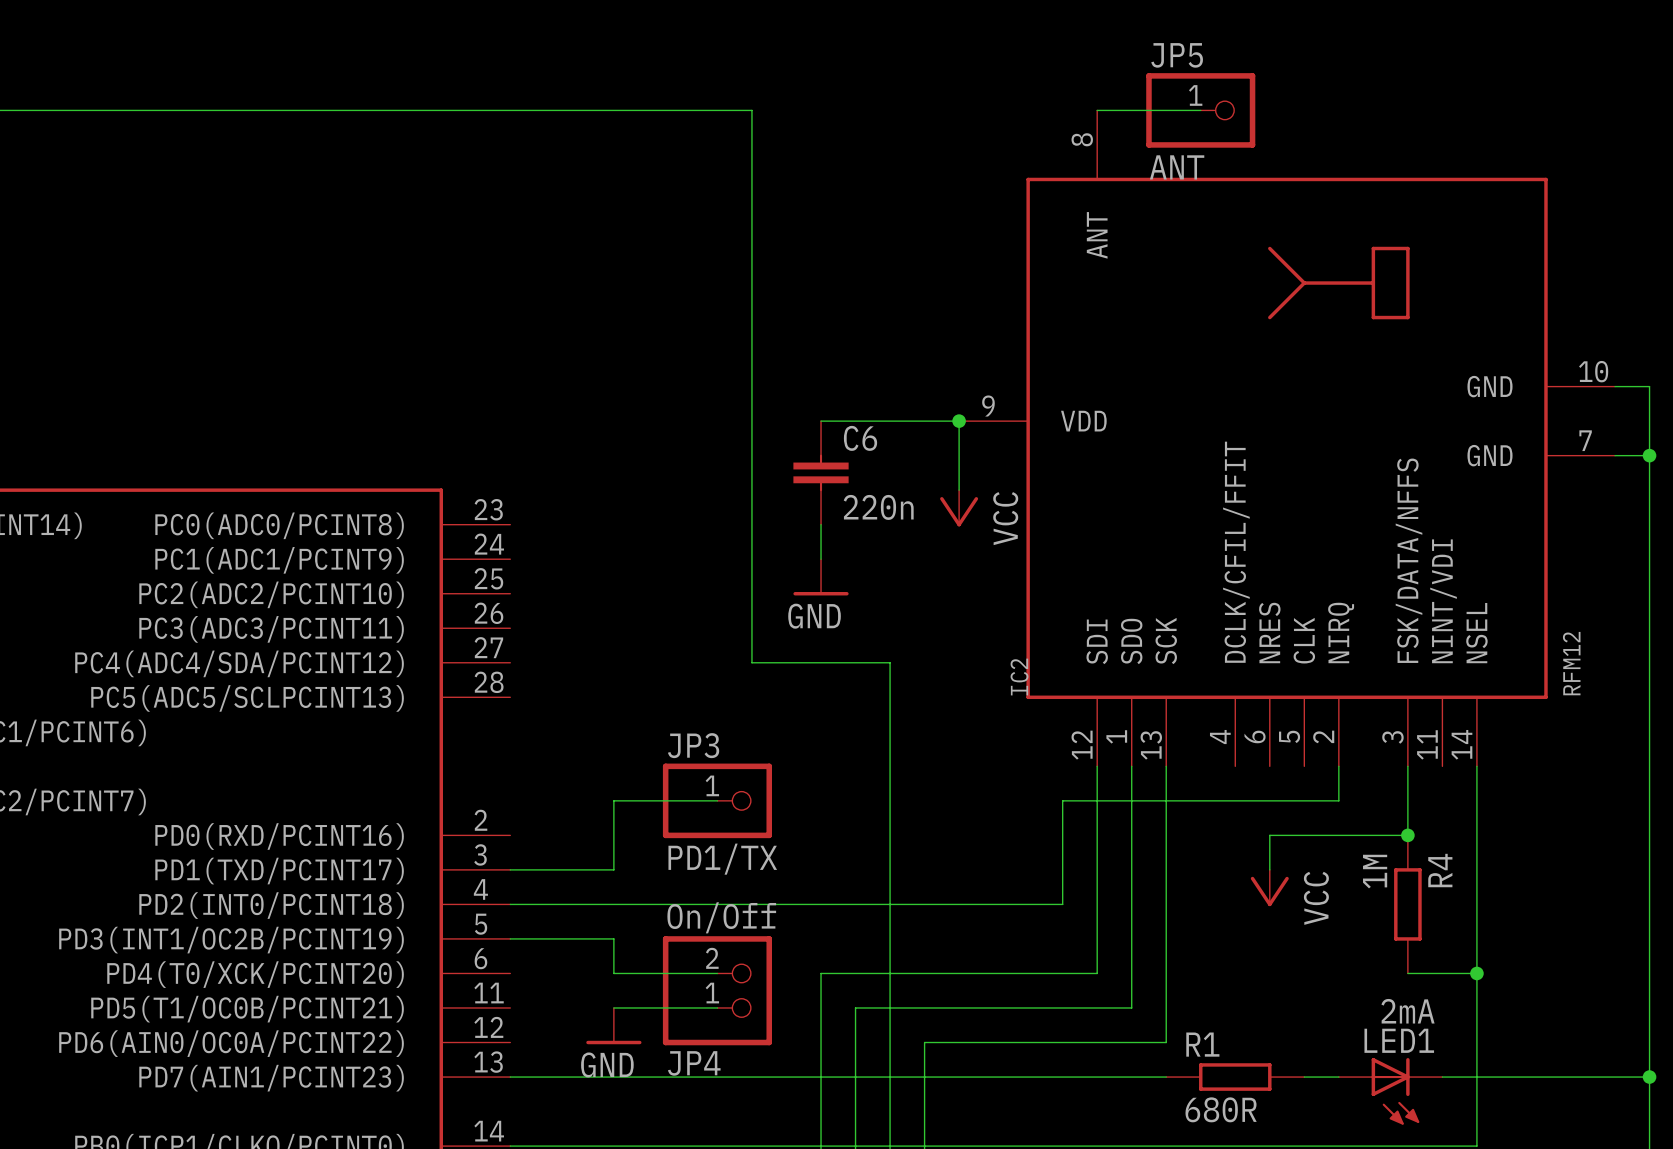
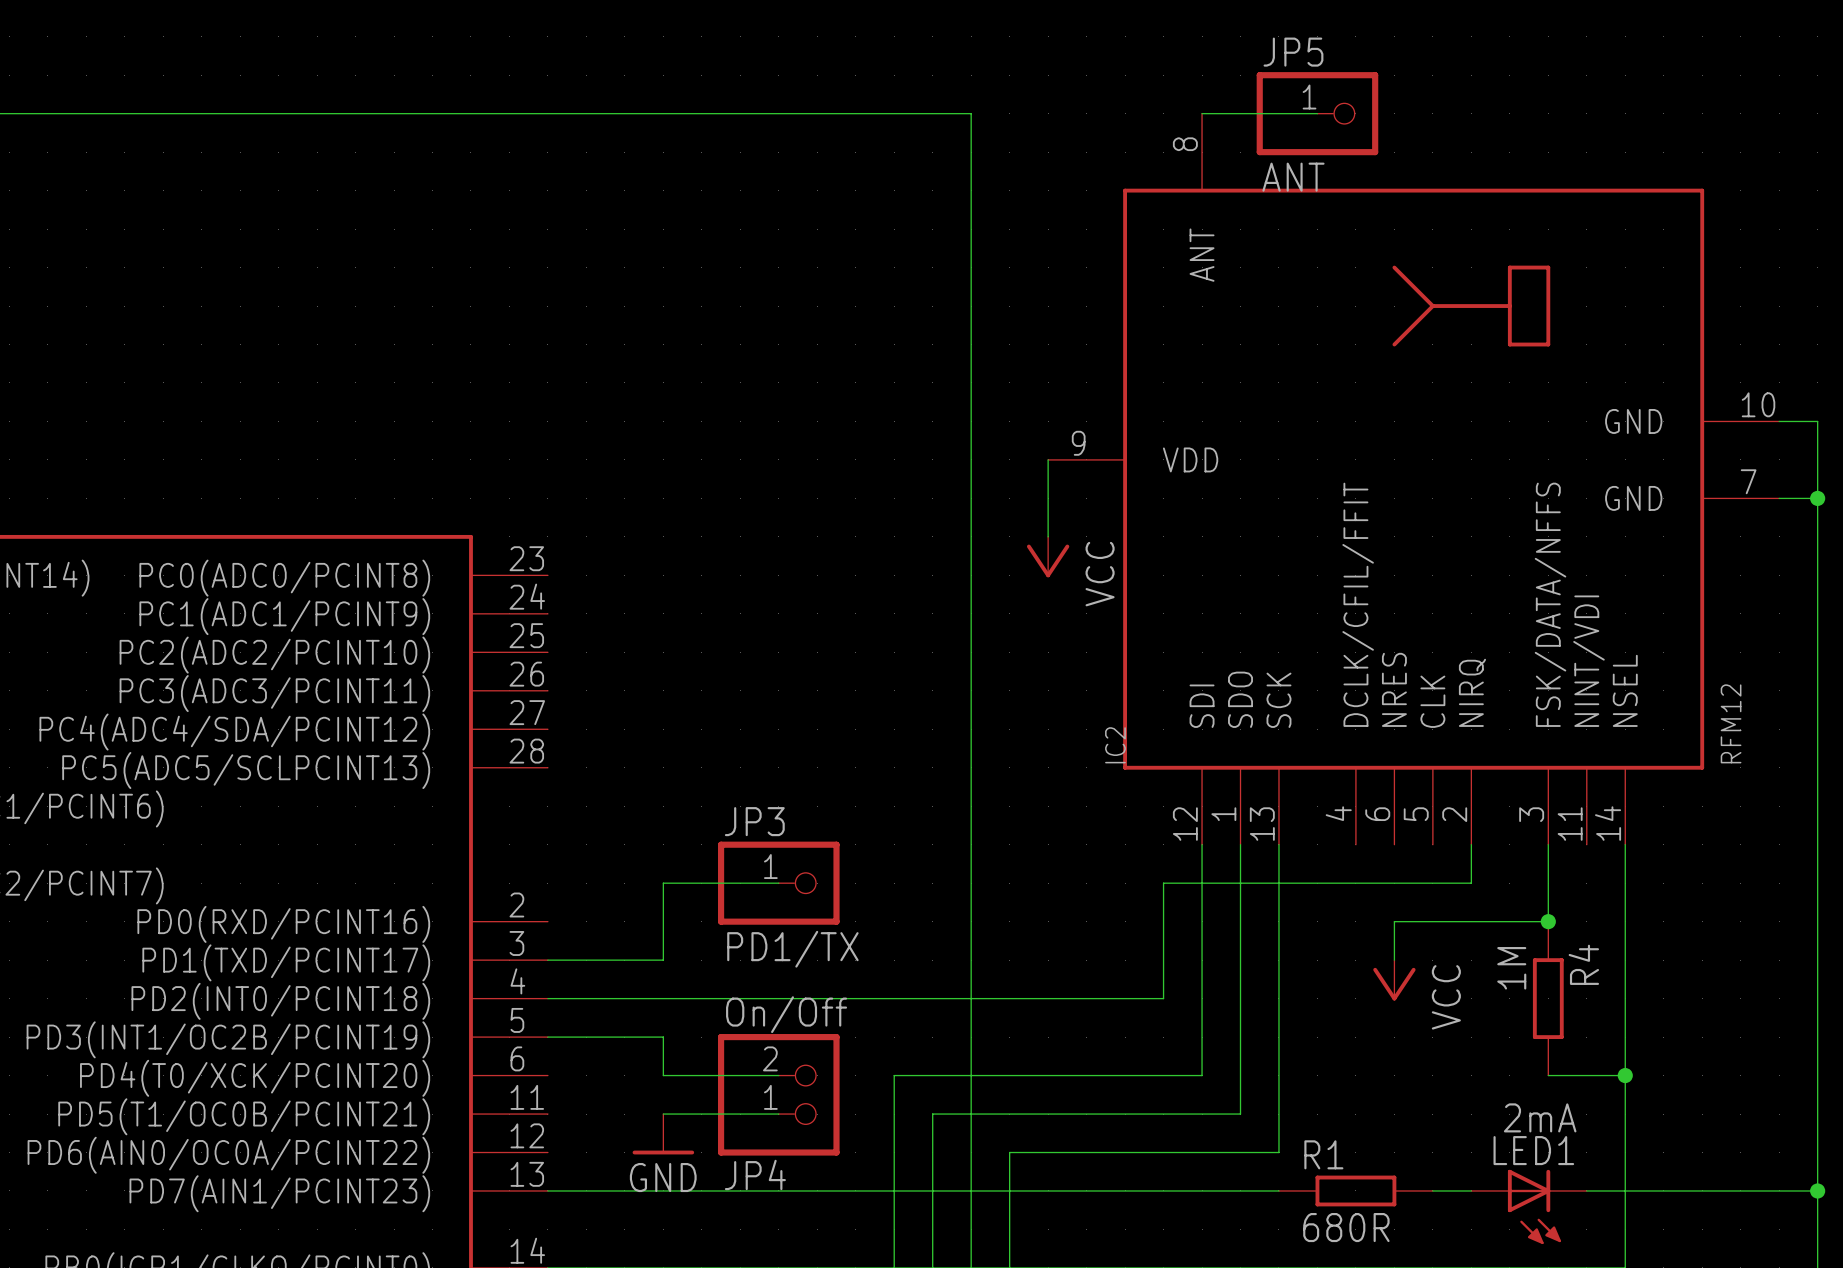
wire: (751, 110) (751, 662) (890, 662) -> (817, 113) (971, 113) (971, 729)
wire: (821, 421) (959, 421) -> none
junction: (959, 421) -> none
C6: 220n (821, 472) -> none
wire: (821, 524) (821, 559) -> none
power symbol: GND (821, 577) -> none

